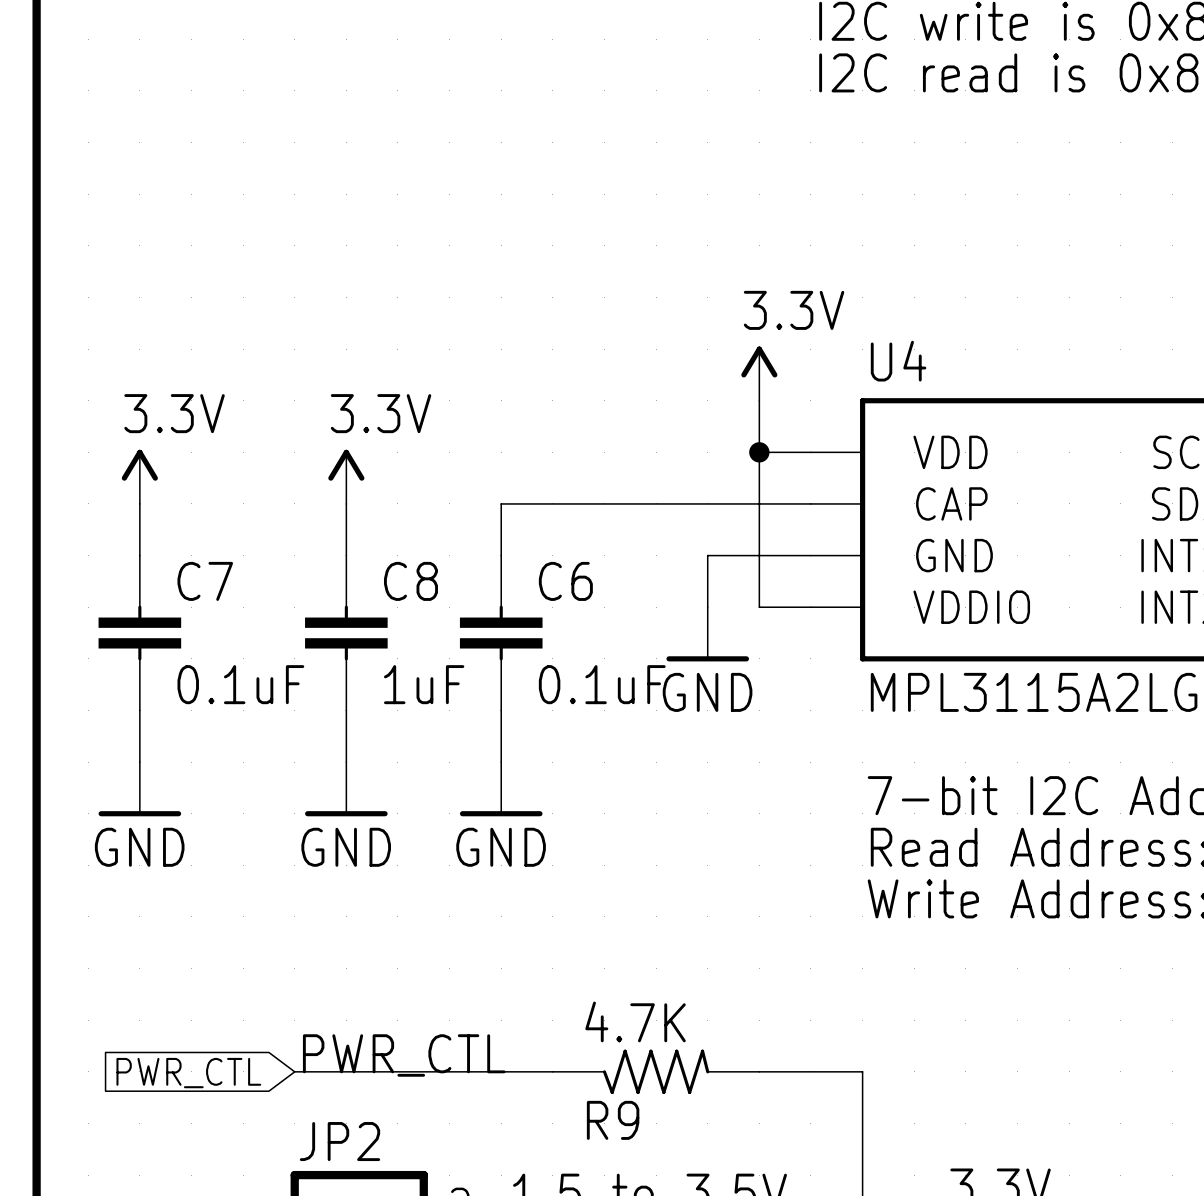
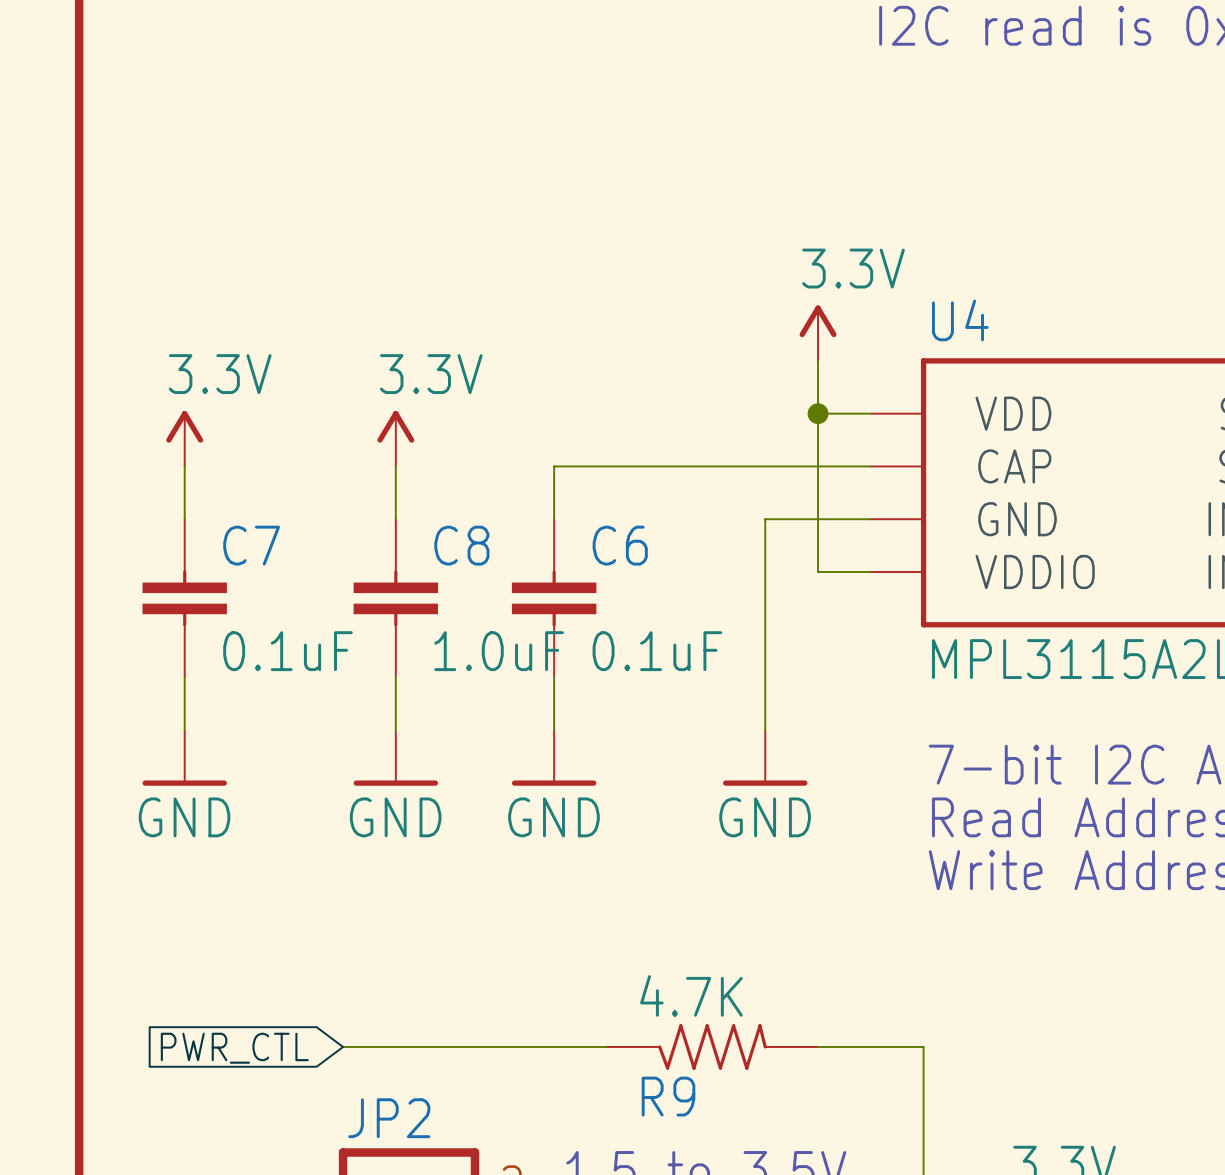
wire: none -> (765, 571) (765, 730)
power symbol position: GND (707, 634) -> GND (765, 758)
C8 value: 1uF (424, 684) -> 1.0uF (499, 651)
label: PWR_CTL (404, 1055) -> none

